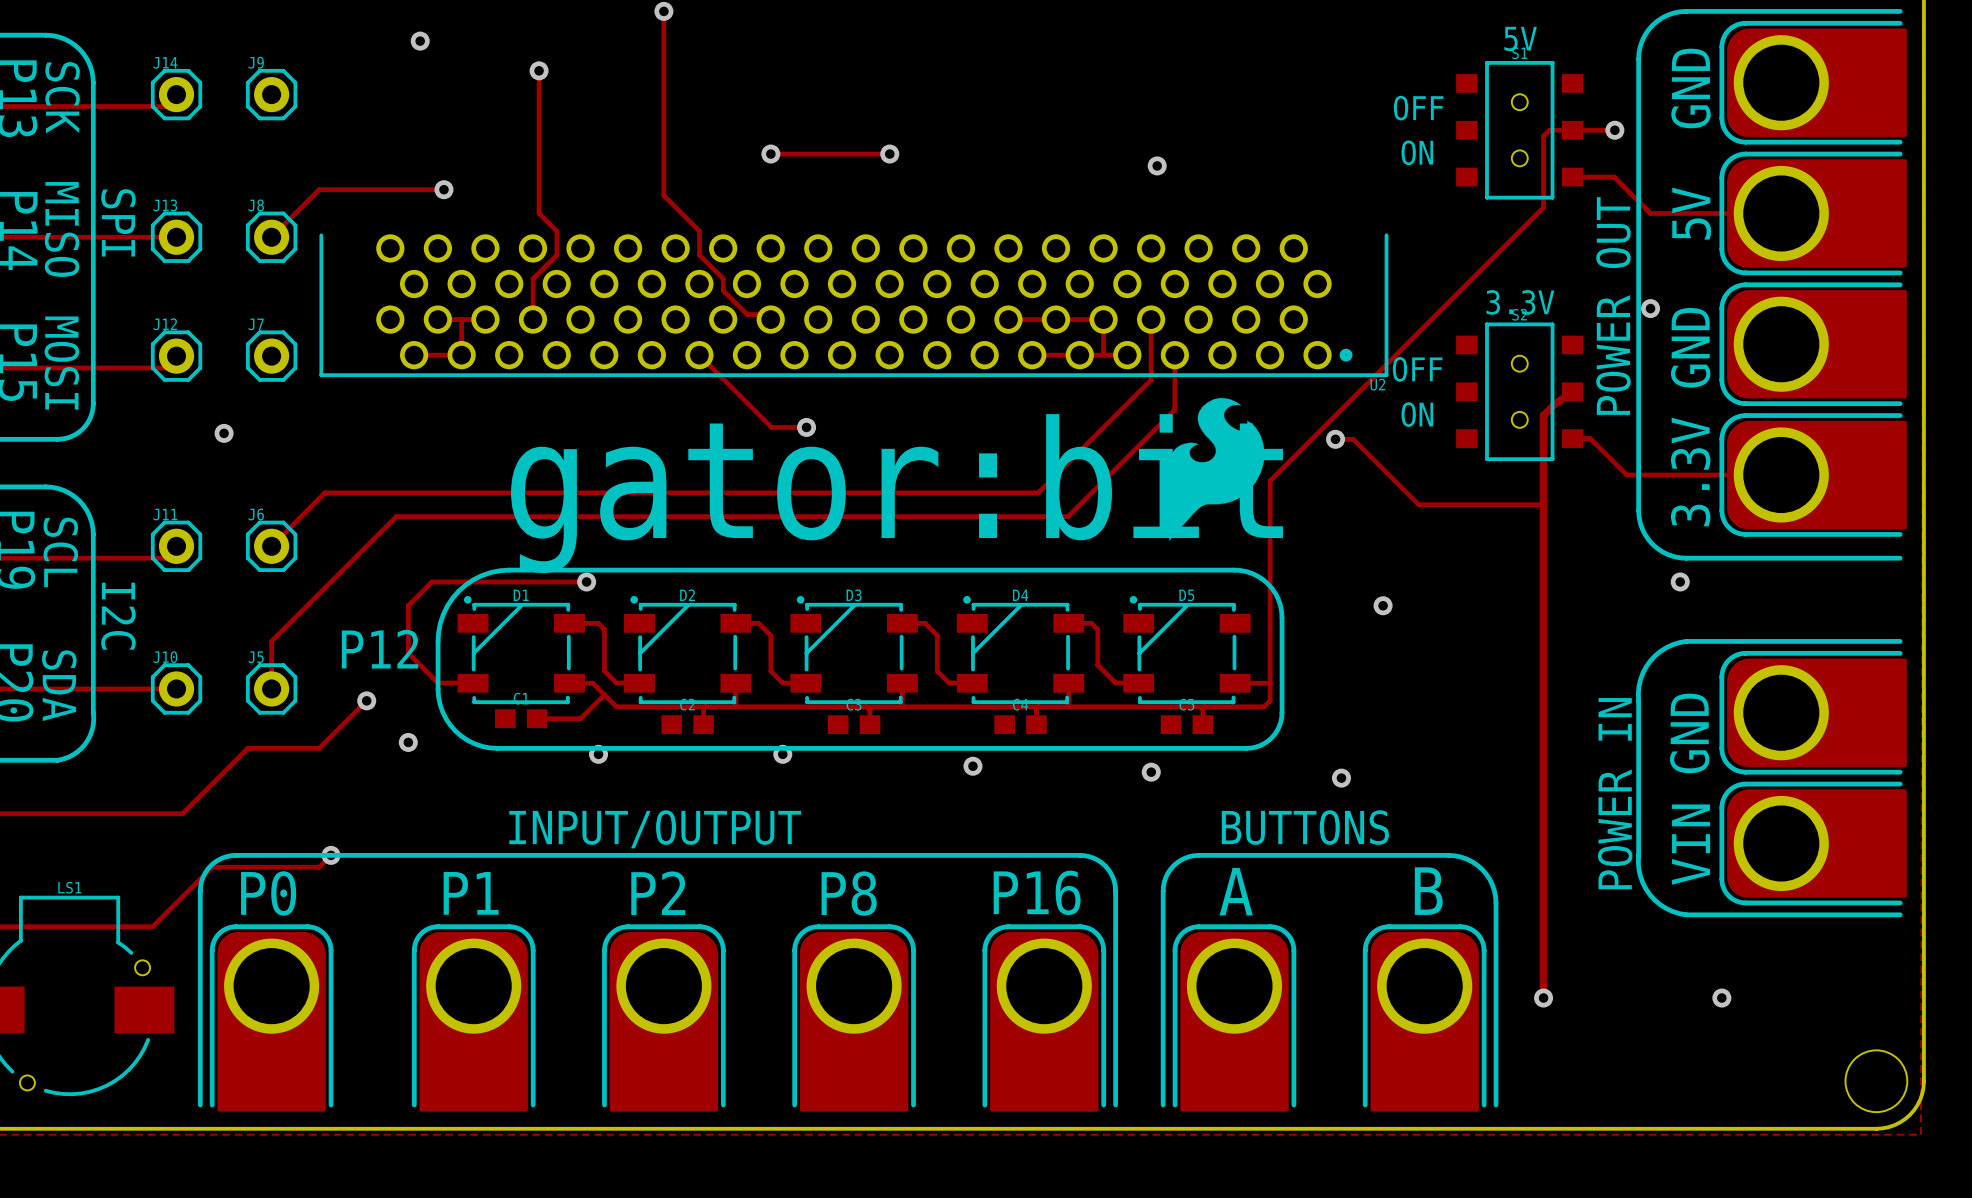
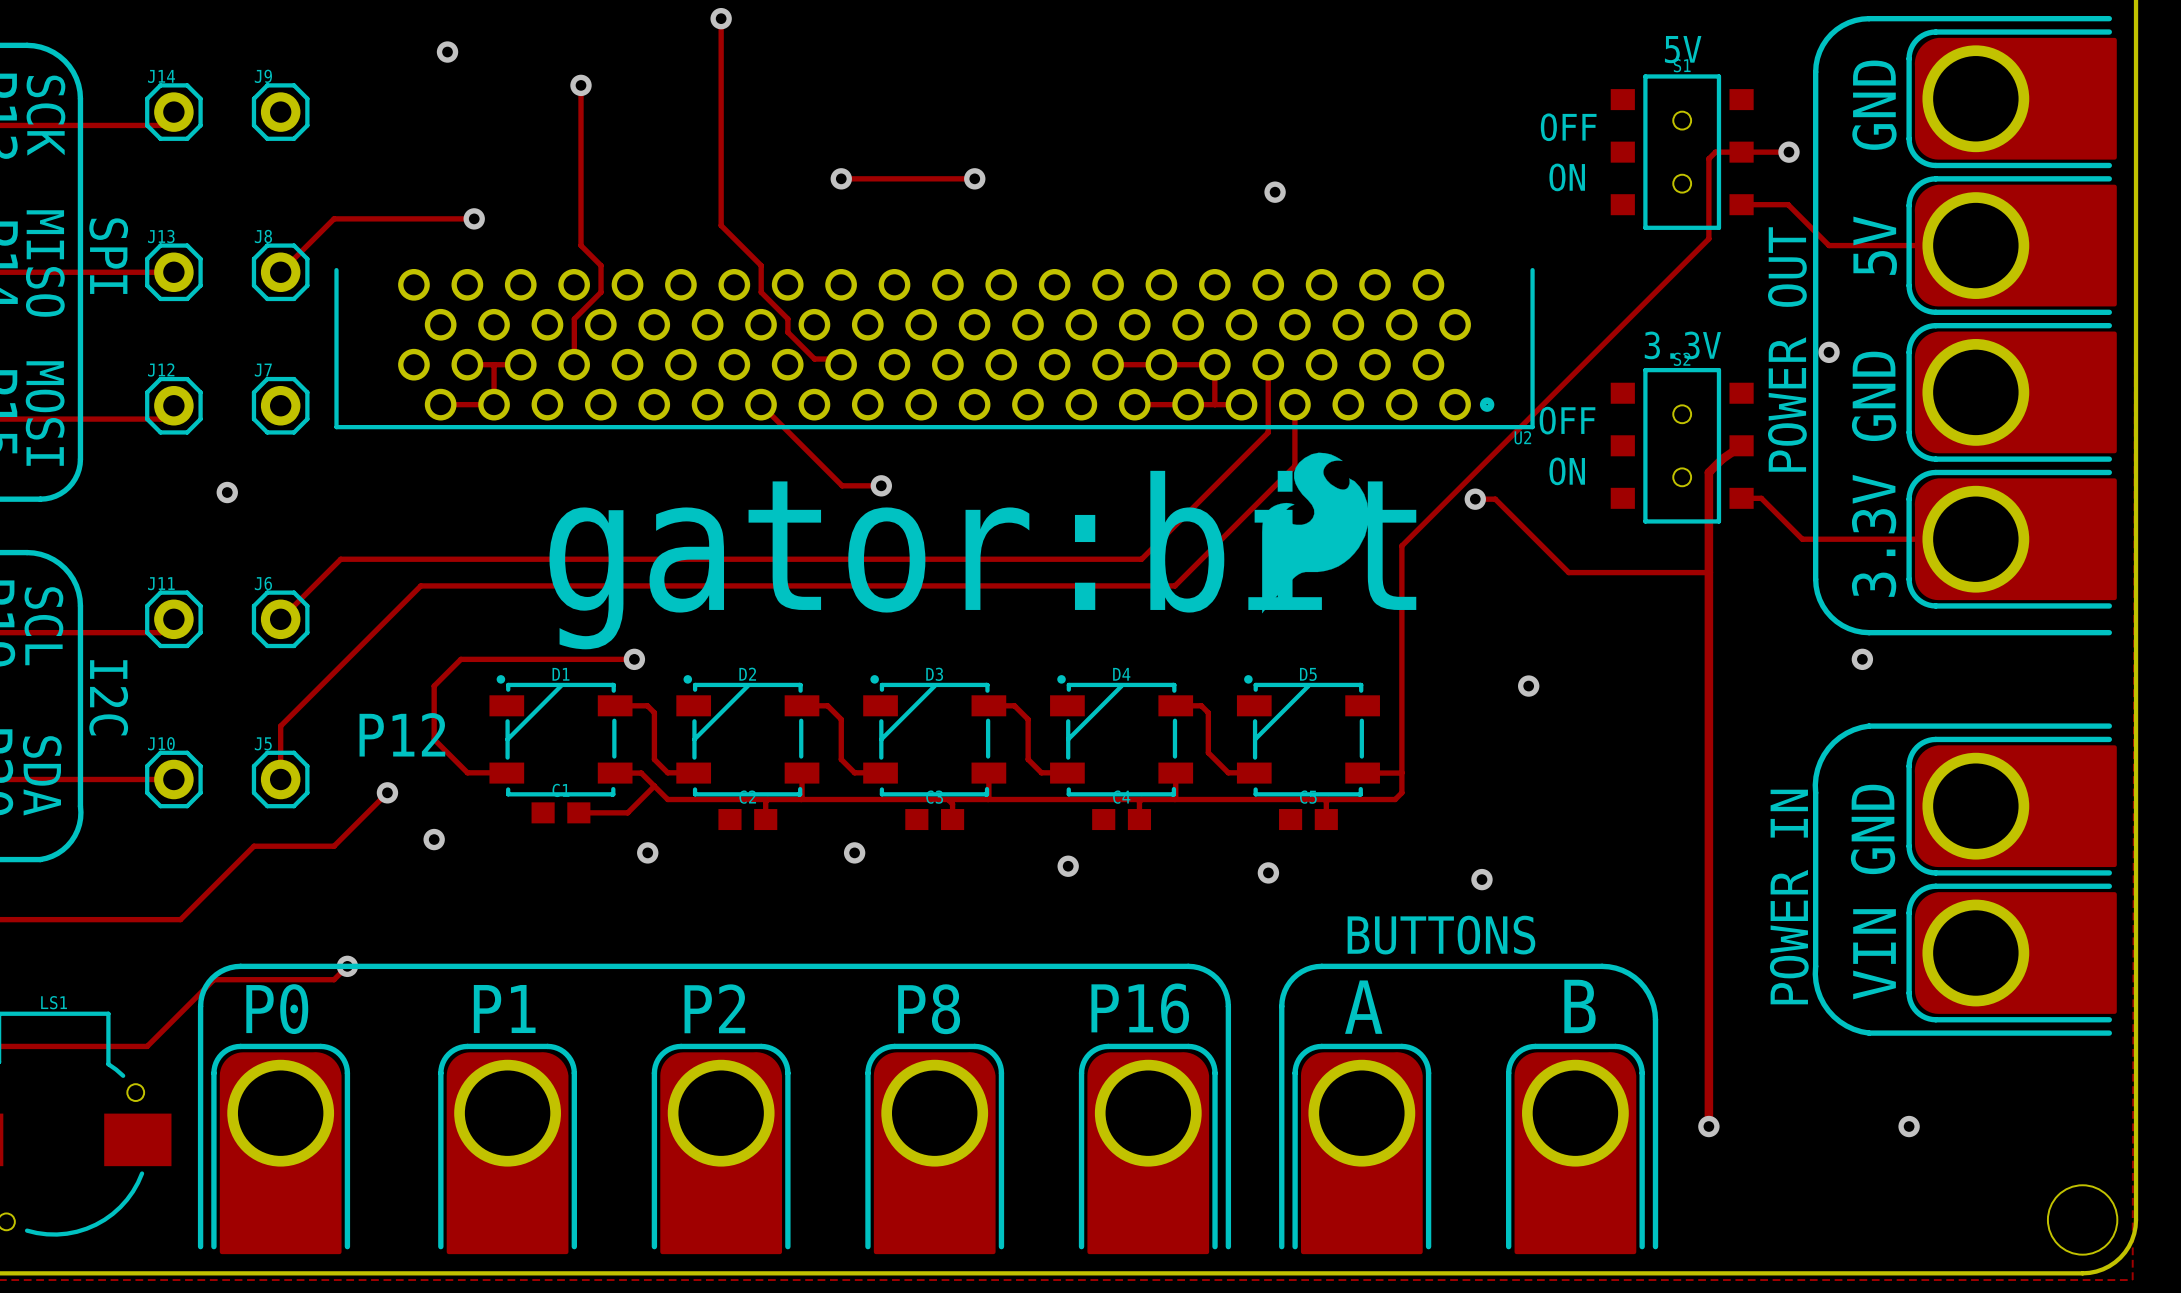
drawing position: (1216, 469) -> (1315, 532)
line: (509, 570) (1240, 570) (1252, 573) (1268, 584) (1275, 593) (1280, 605) (1281, 717) (1277, 730) (1268, 741) (1255, 747) (1246, 748) (489, 747) (474, 743) (461, 736) (450, 725) (442, 711) (438, 688) (438, 632) (447, 605) (458, 590) (482, 575) (509, 570) -> none
text: INPUT/OUTPUT (655, 829) -> none

